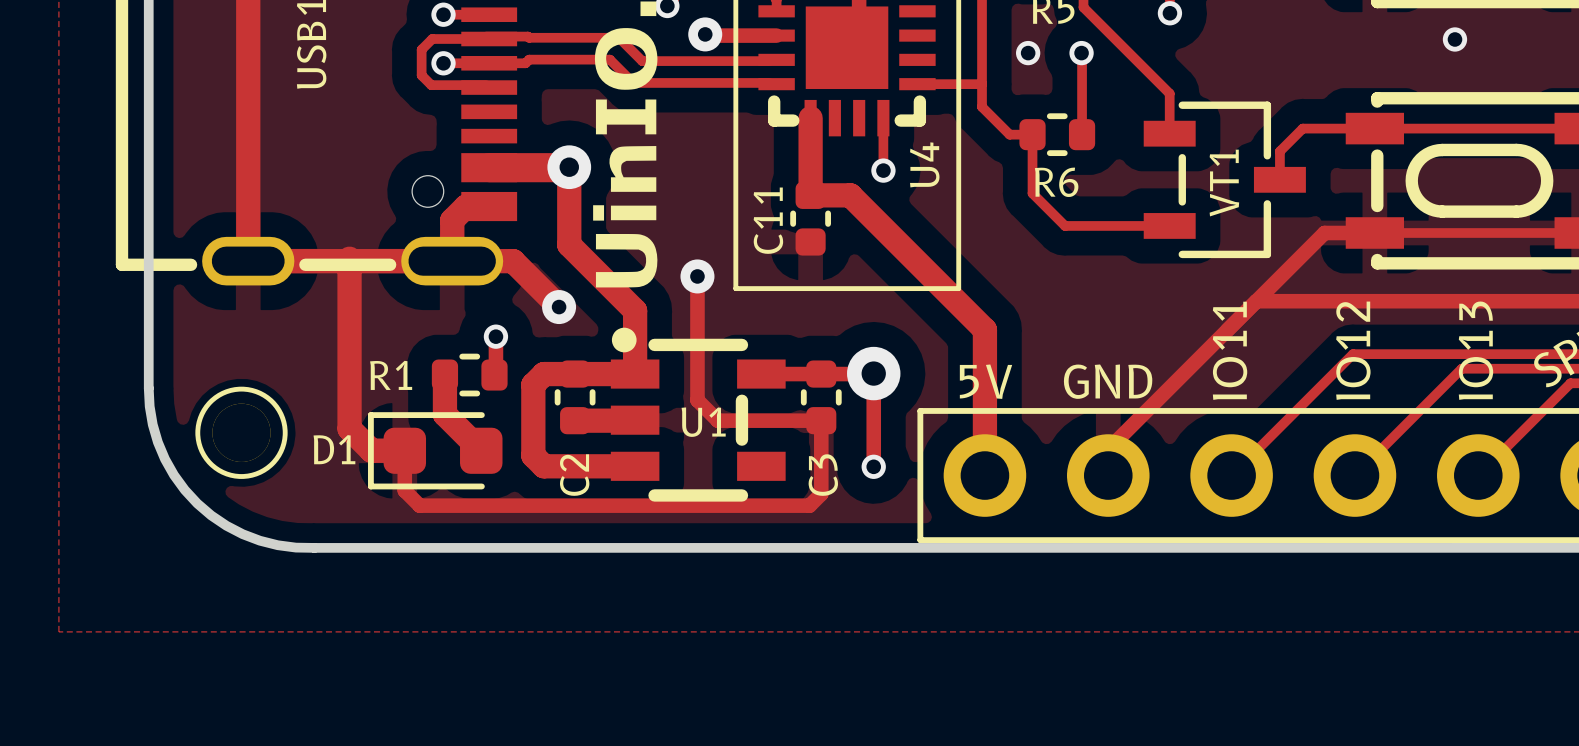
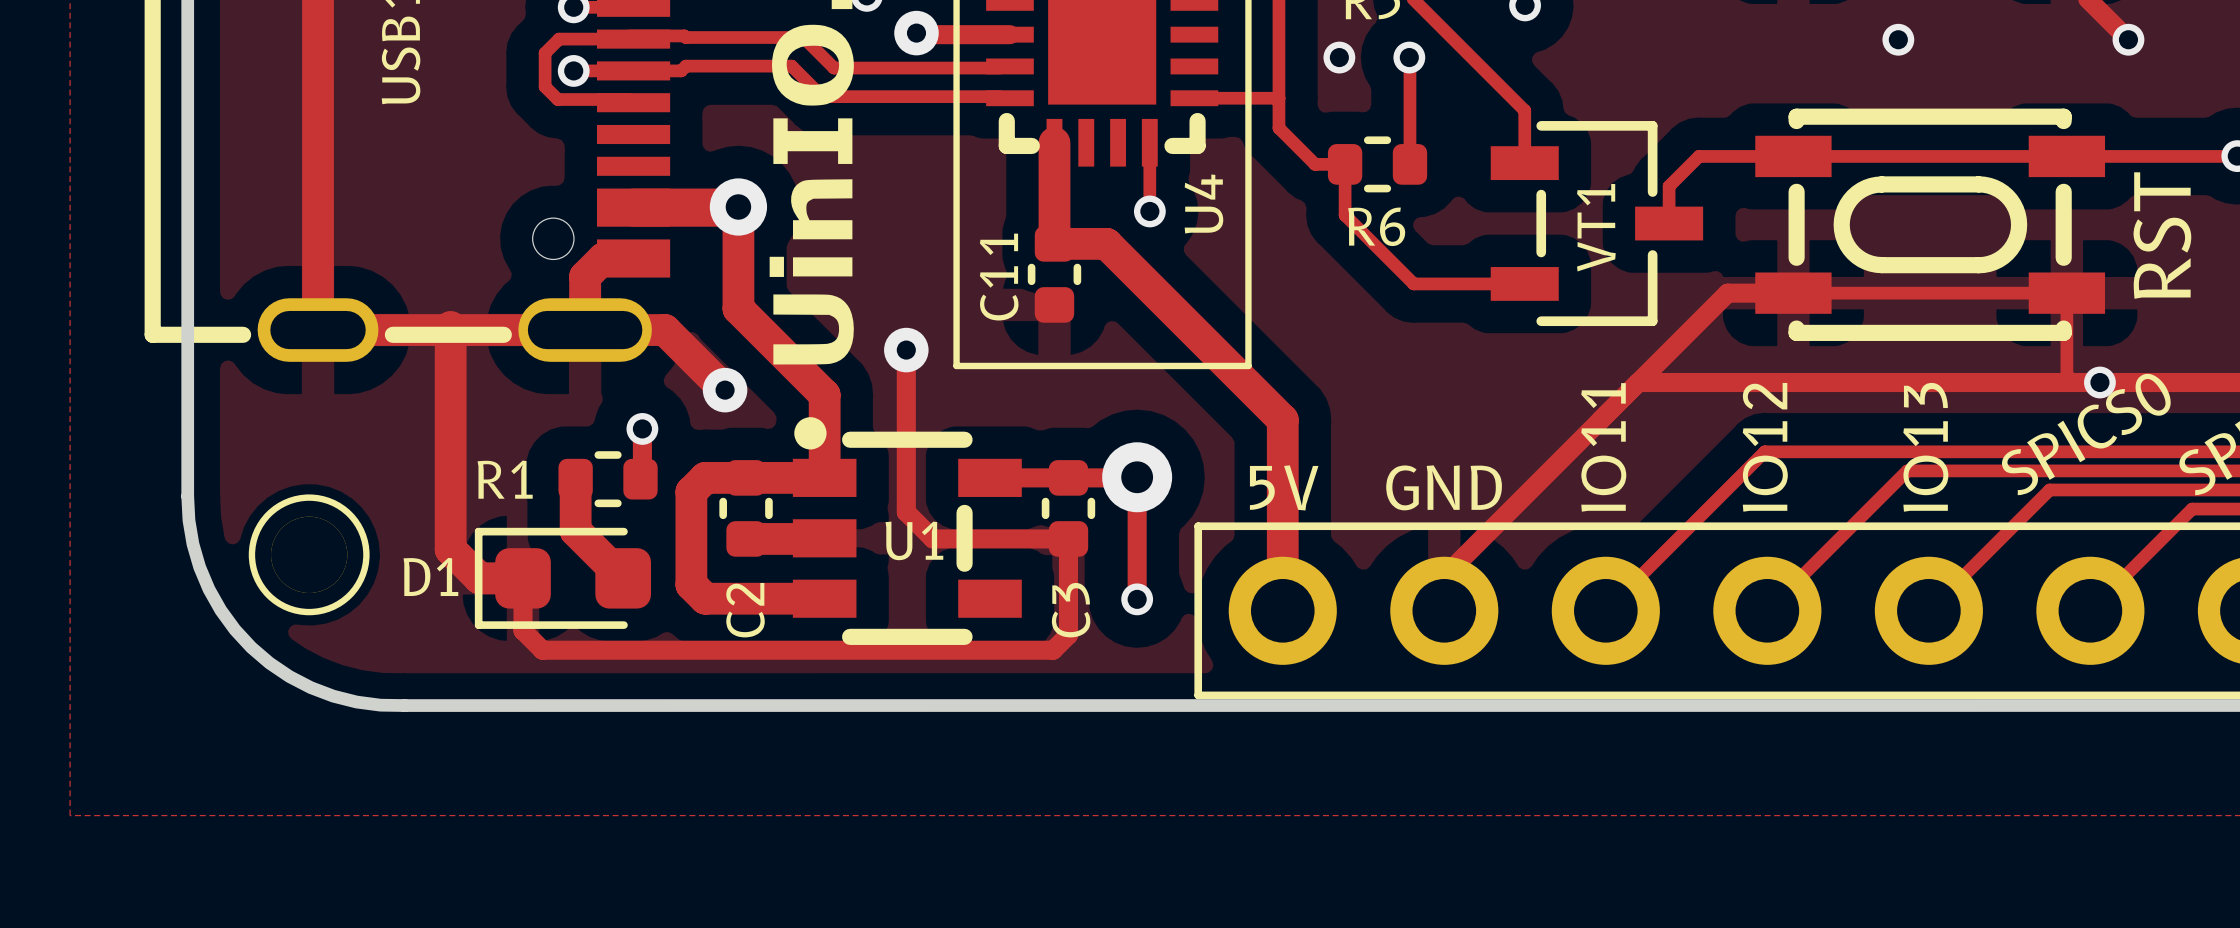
track: (1032, 173) (1032, 193) (1065, 225) (1084, 225) -> (1345, 215) (1413, 283)

